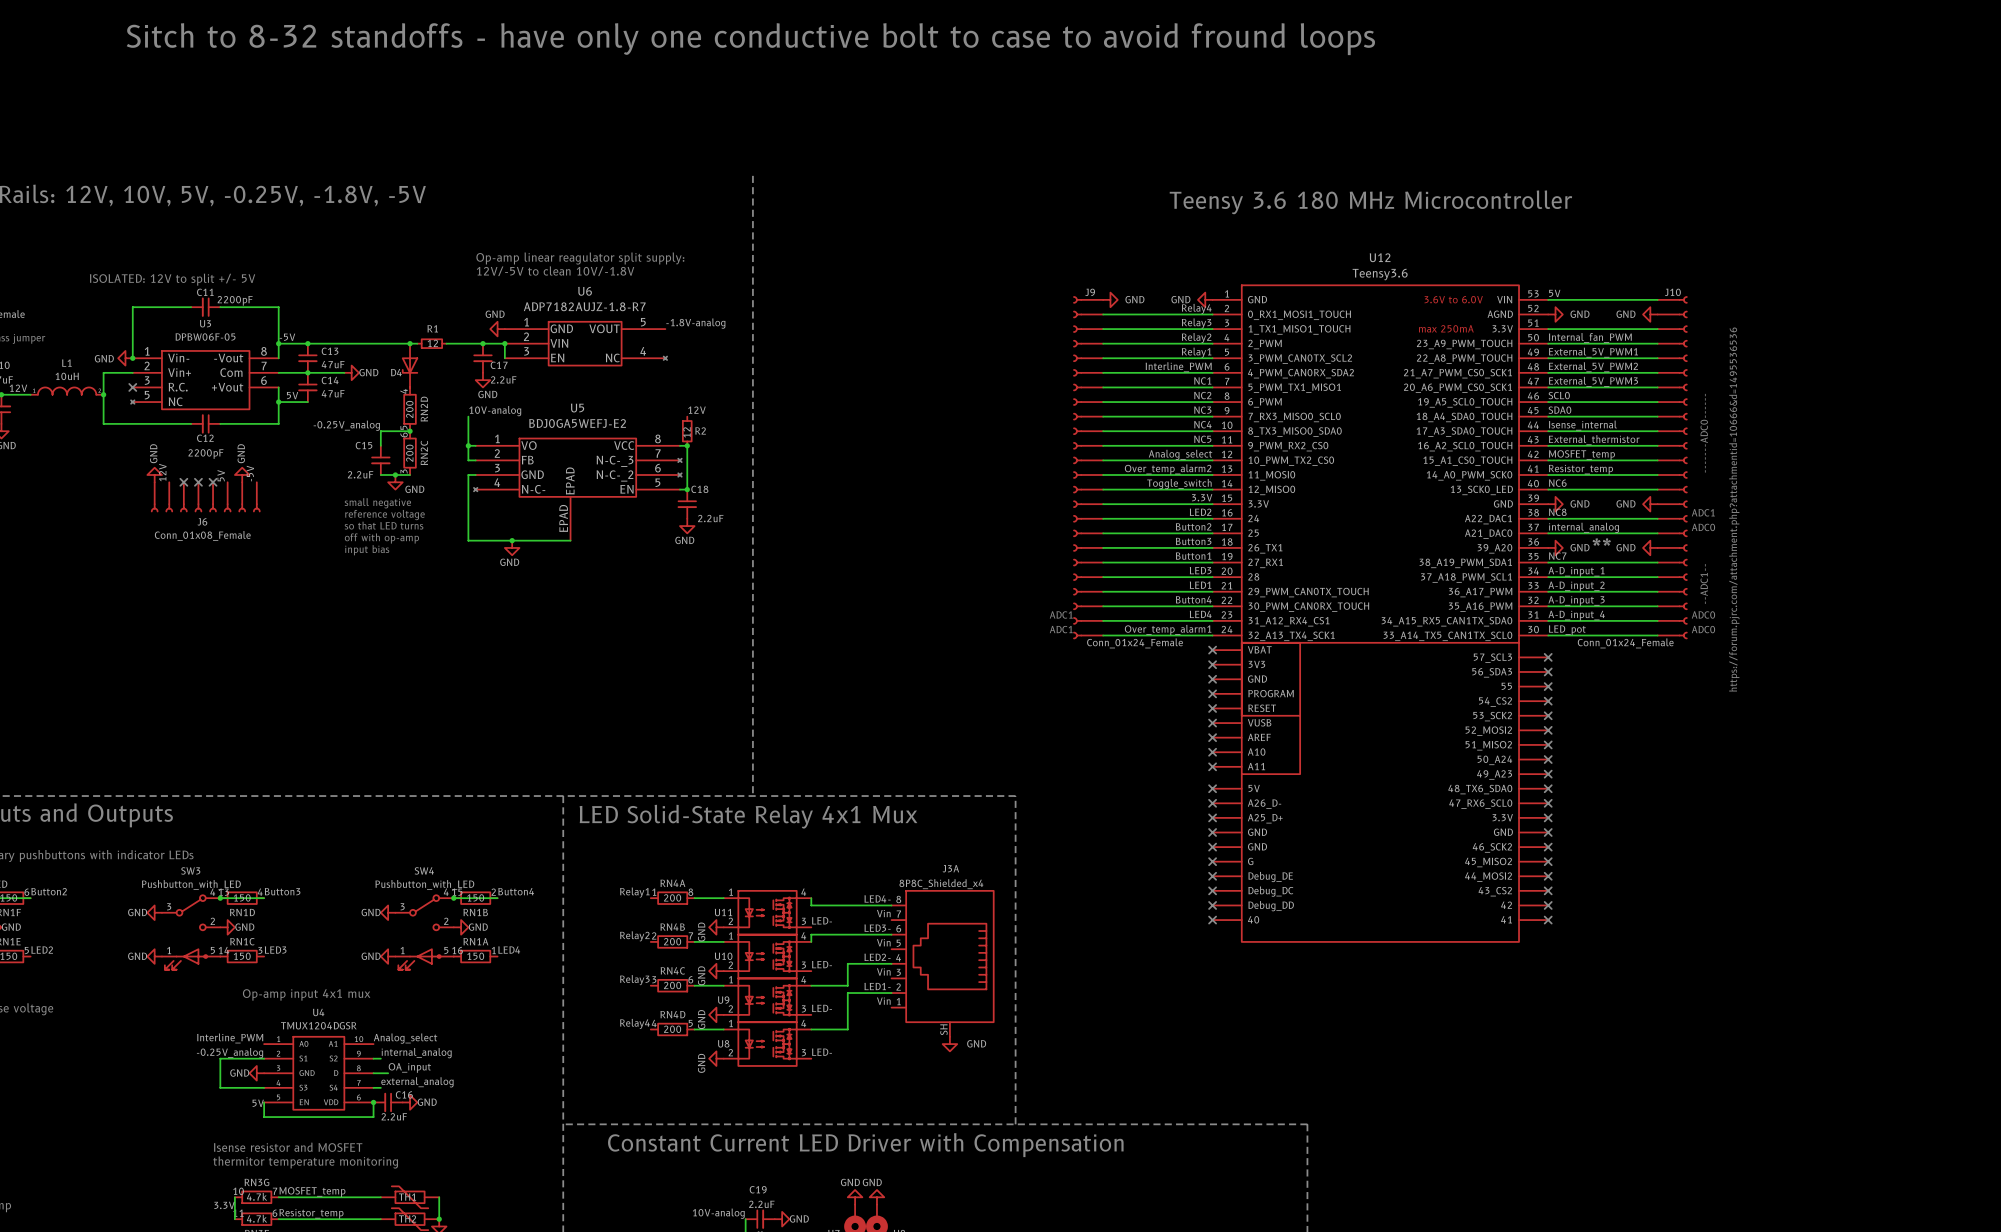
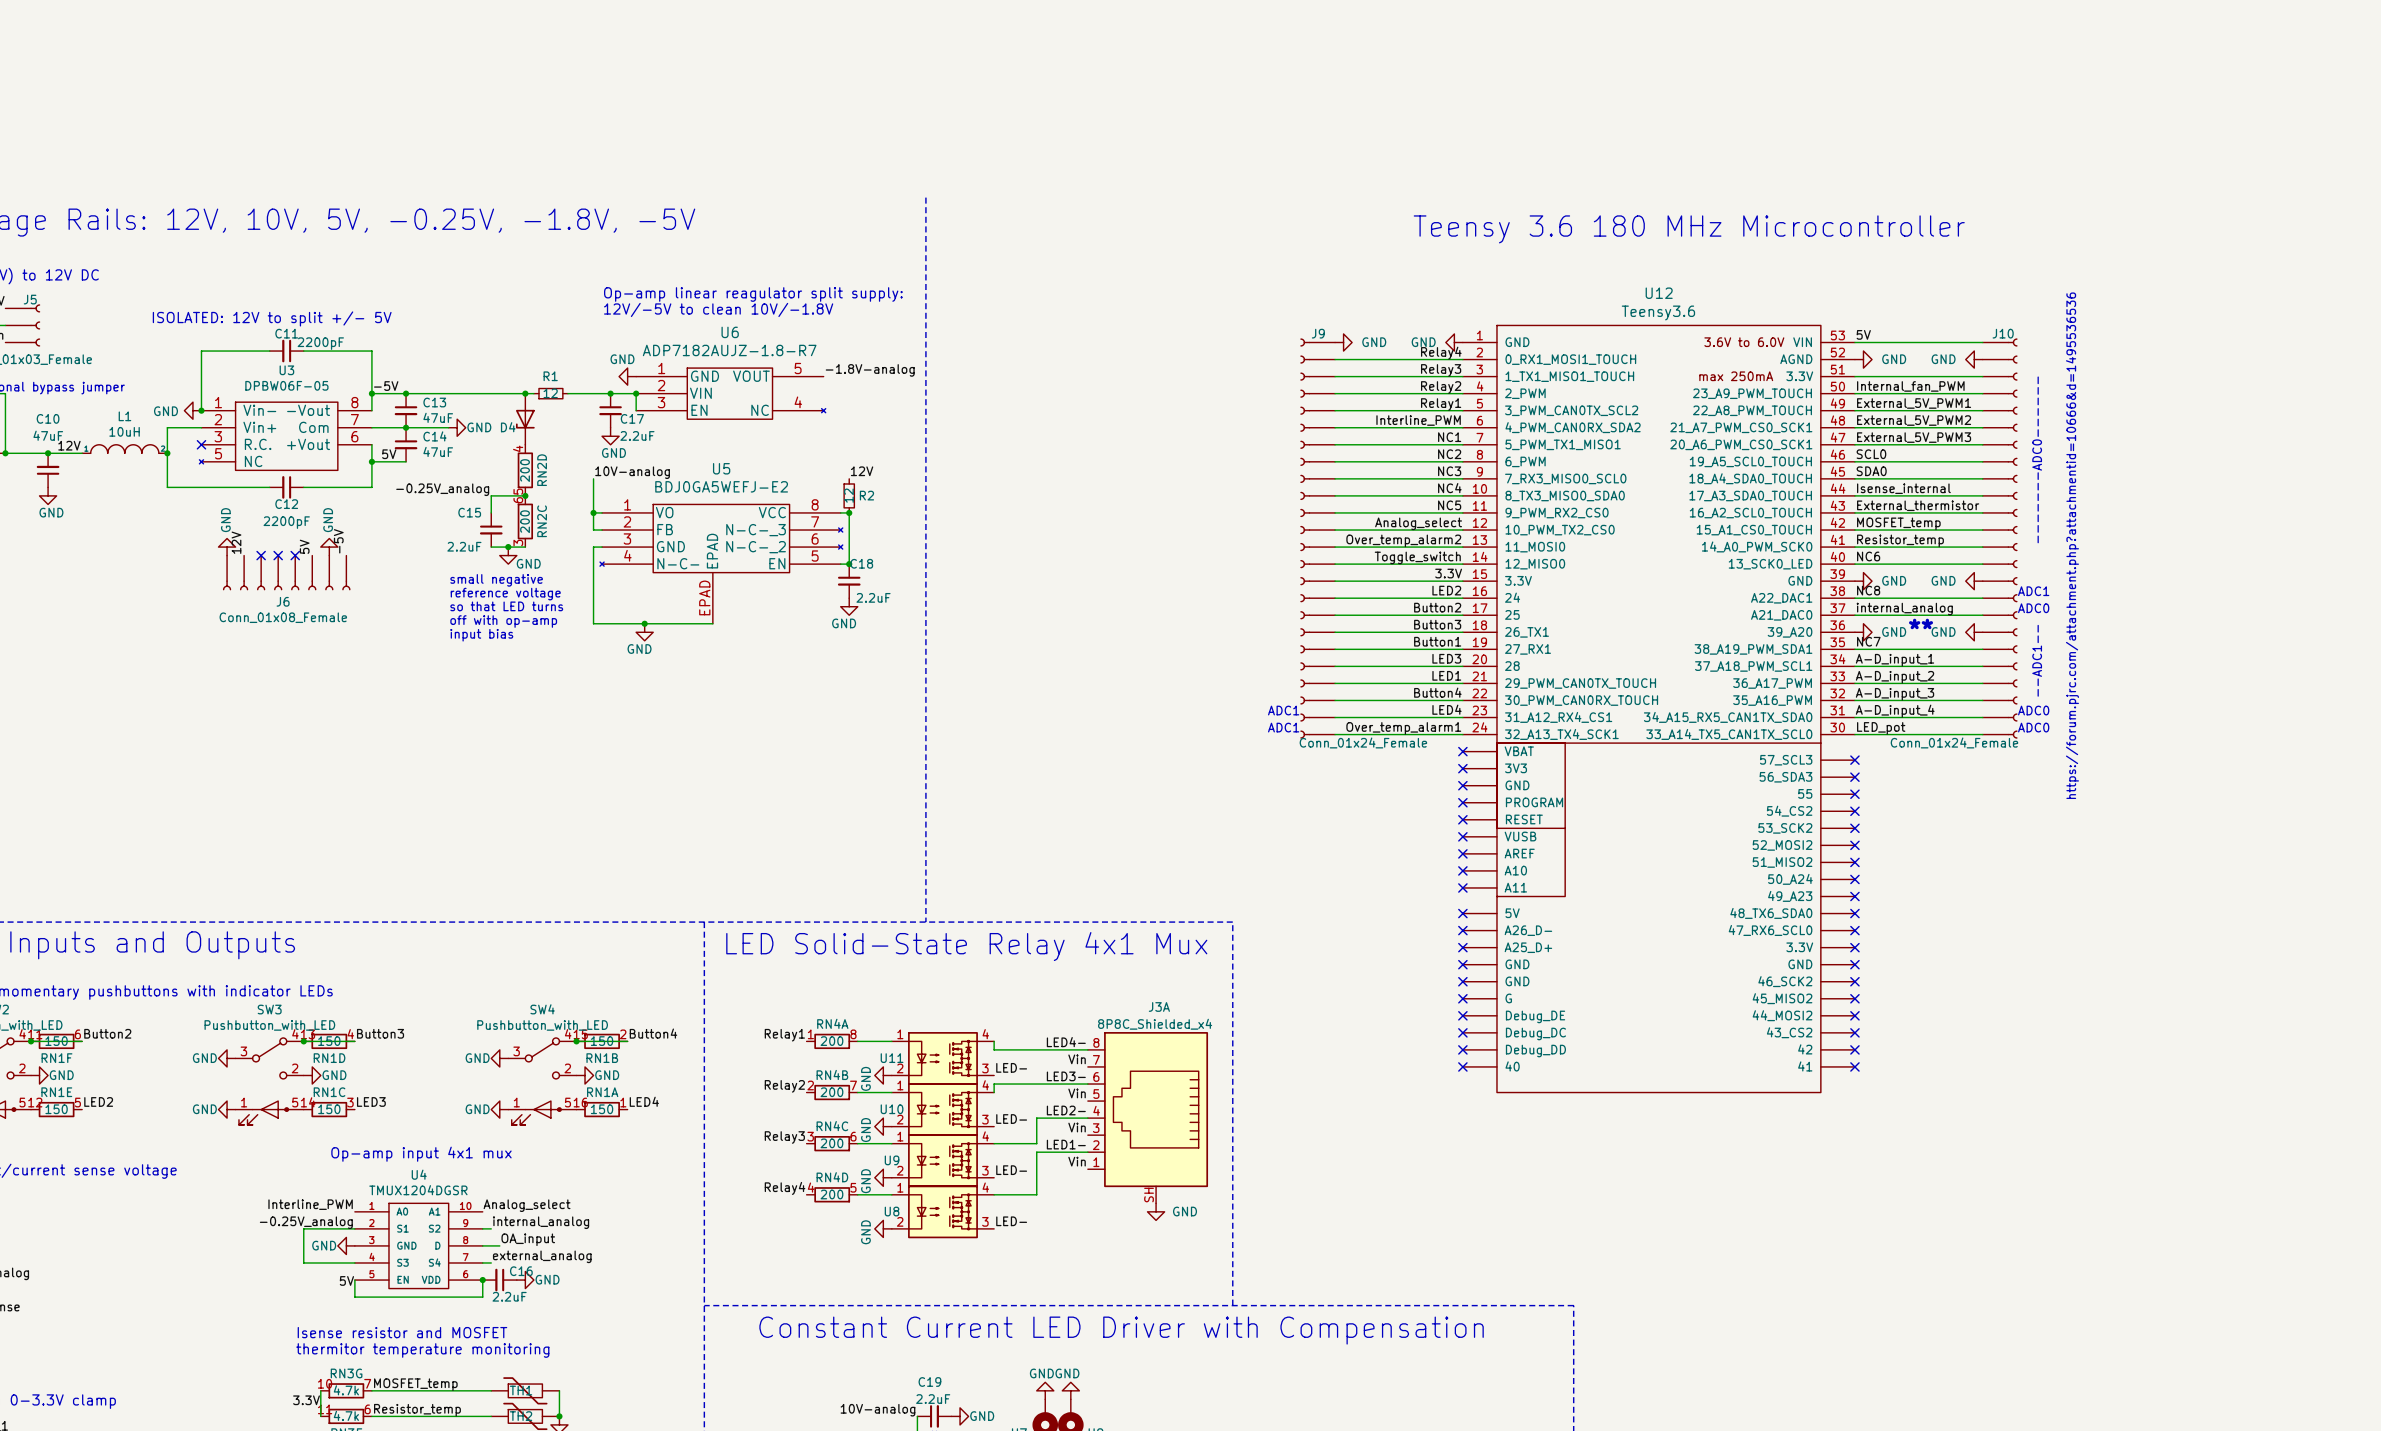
text: Sitch to 8-32 standoffs - have only one conductive bolt to case to avoid fround loops (750, 39) -> none

